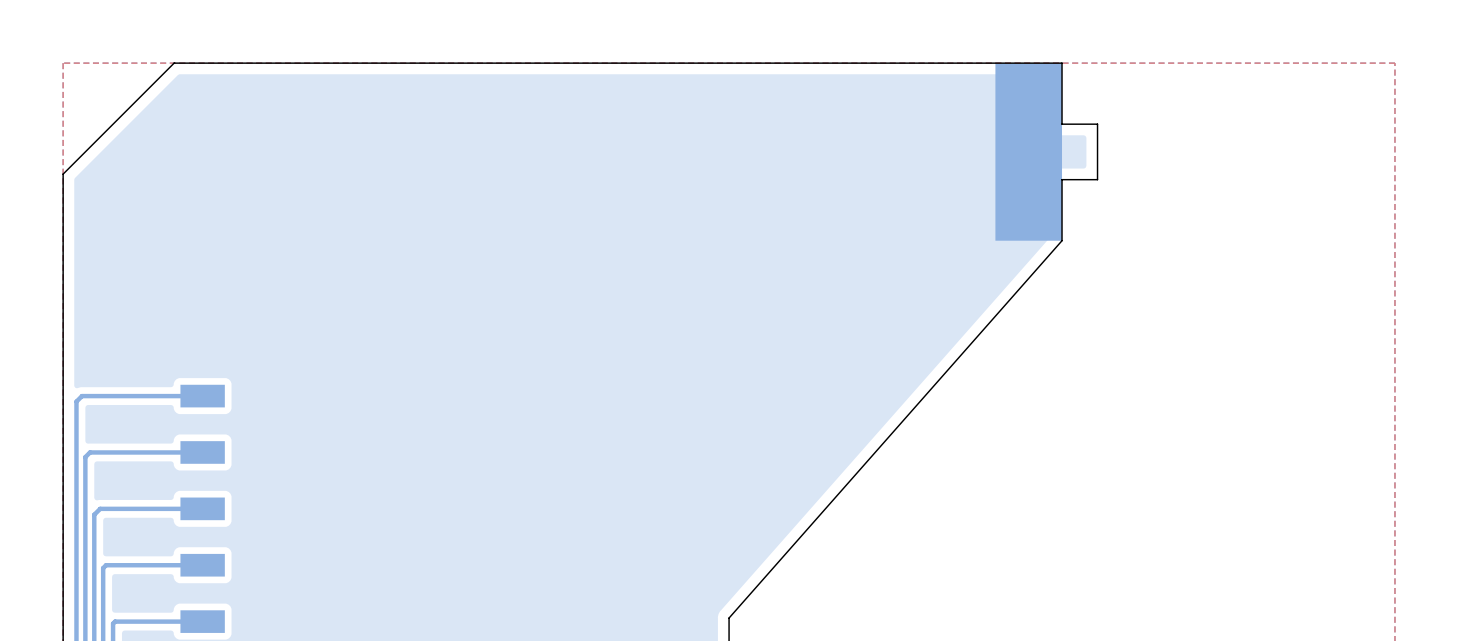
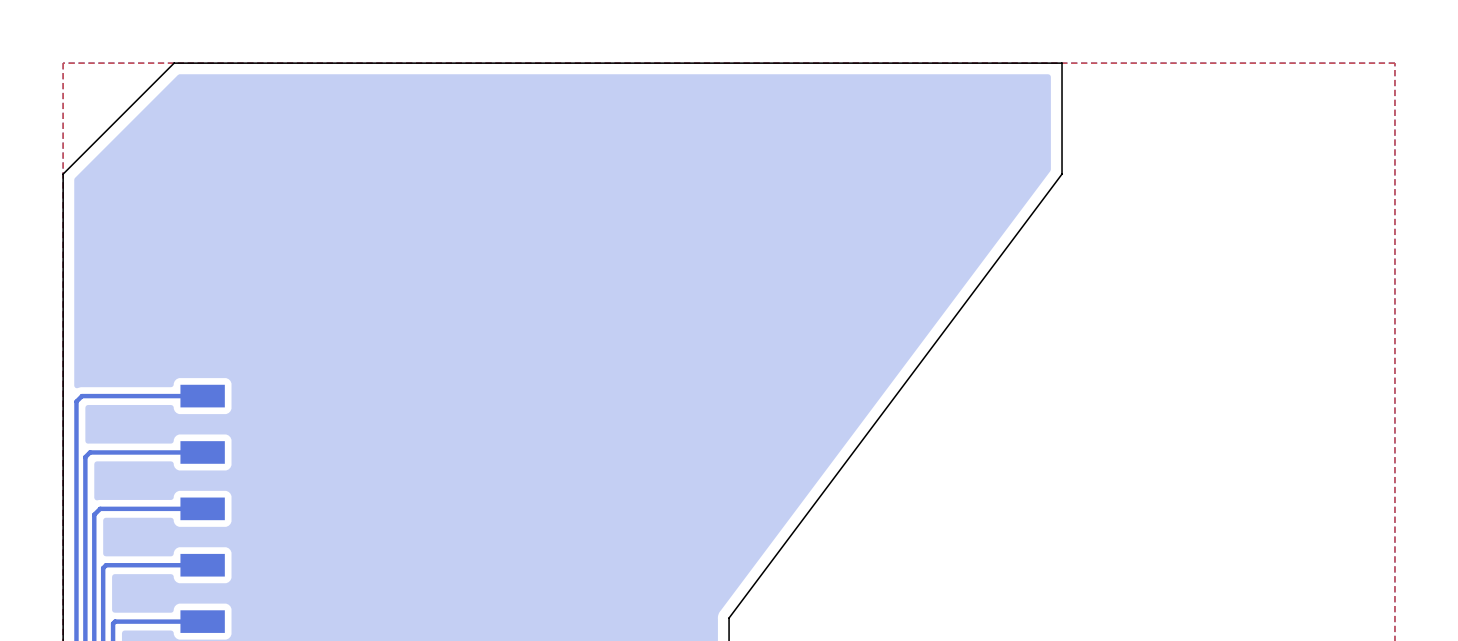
board edge: (1062, 124) (1097, 124) (1097, 179) (1062, 179) (1062, 240) (729, 618) -> (1062, 124) (1062, 174) (729, 618)
part: (1028, 151) -> none

